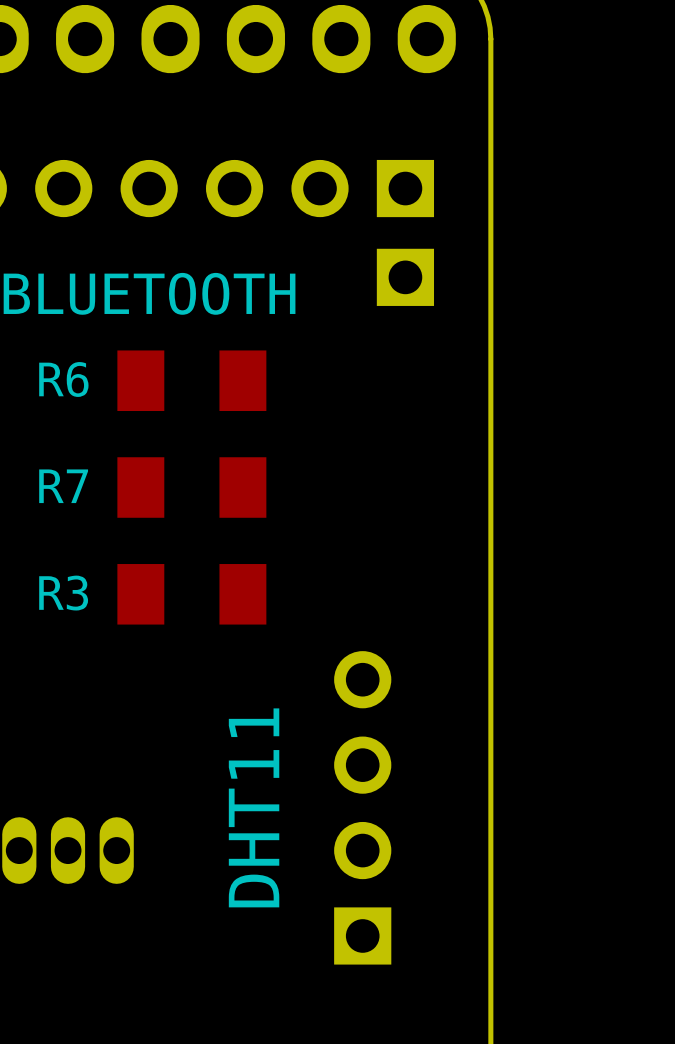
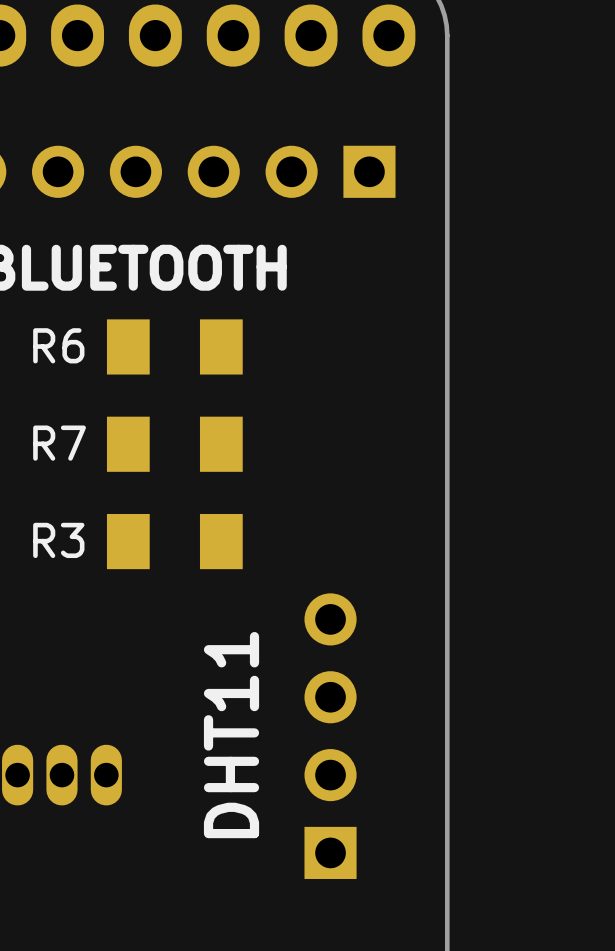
part: (405, 277) -> none

